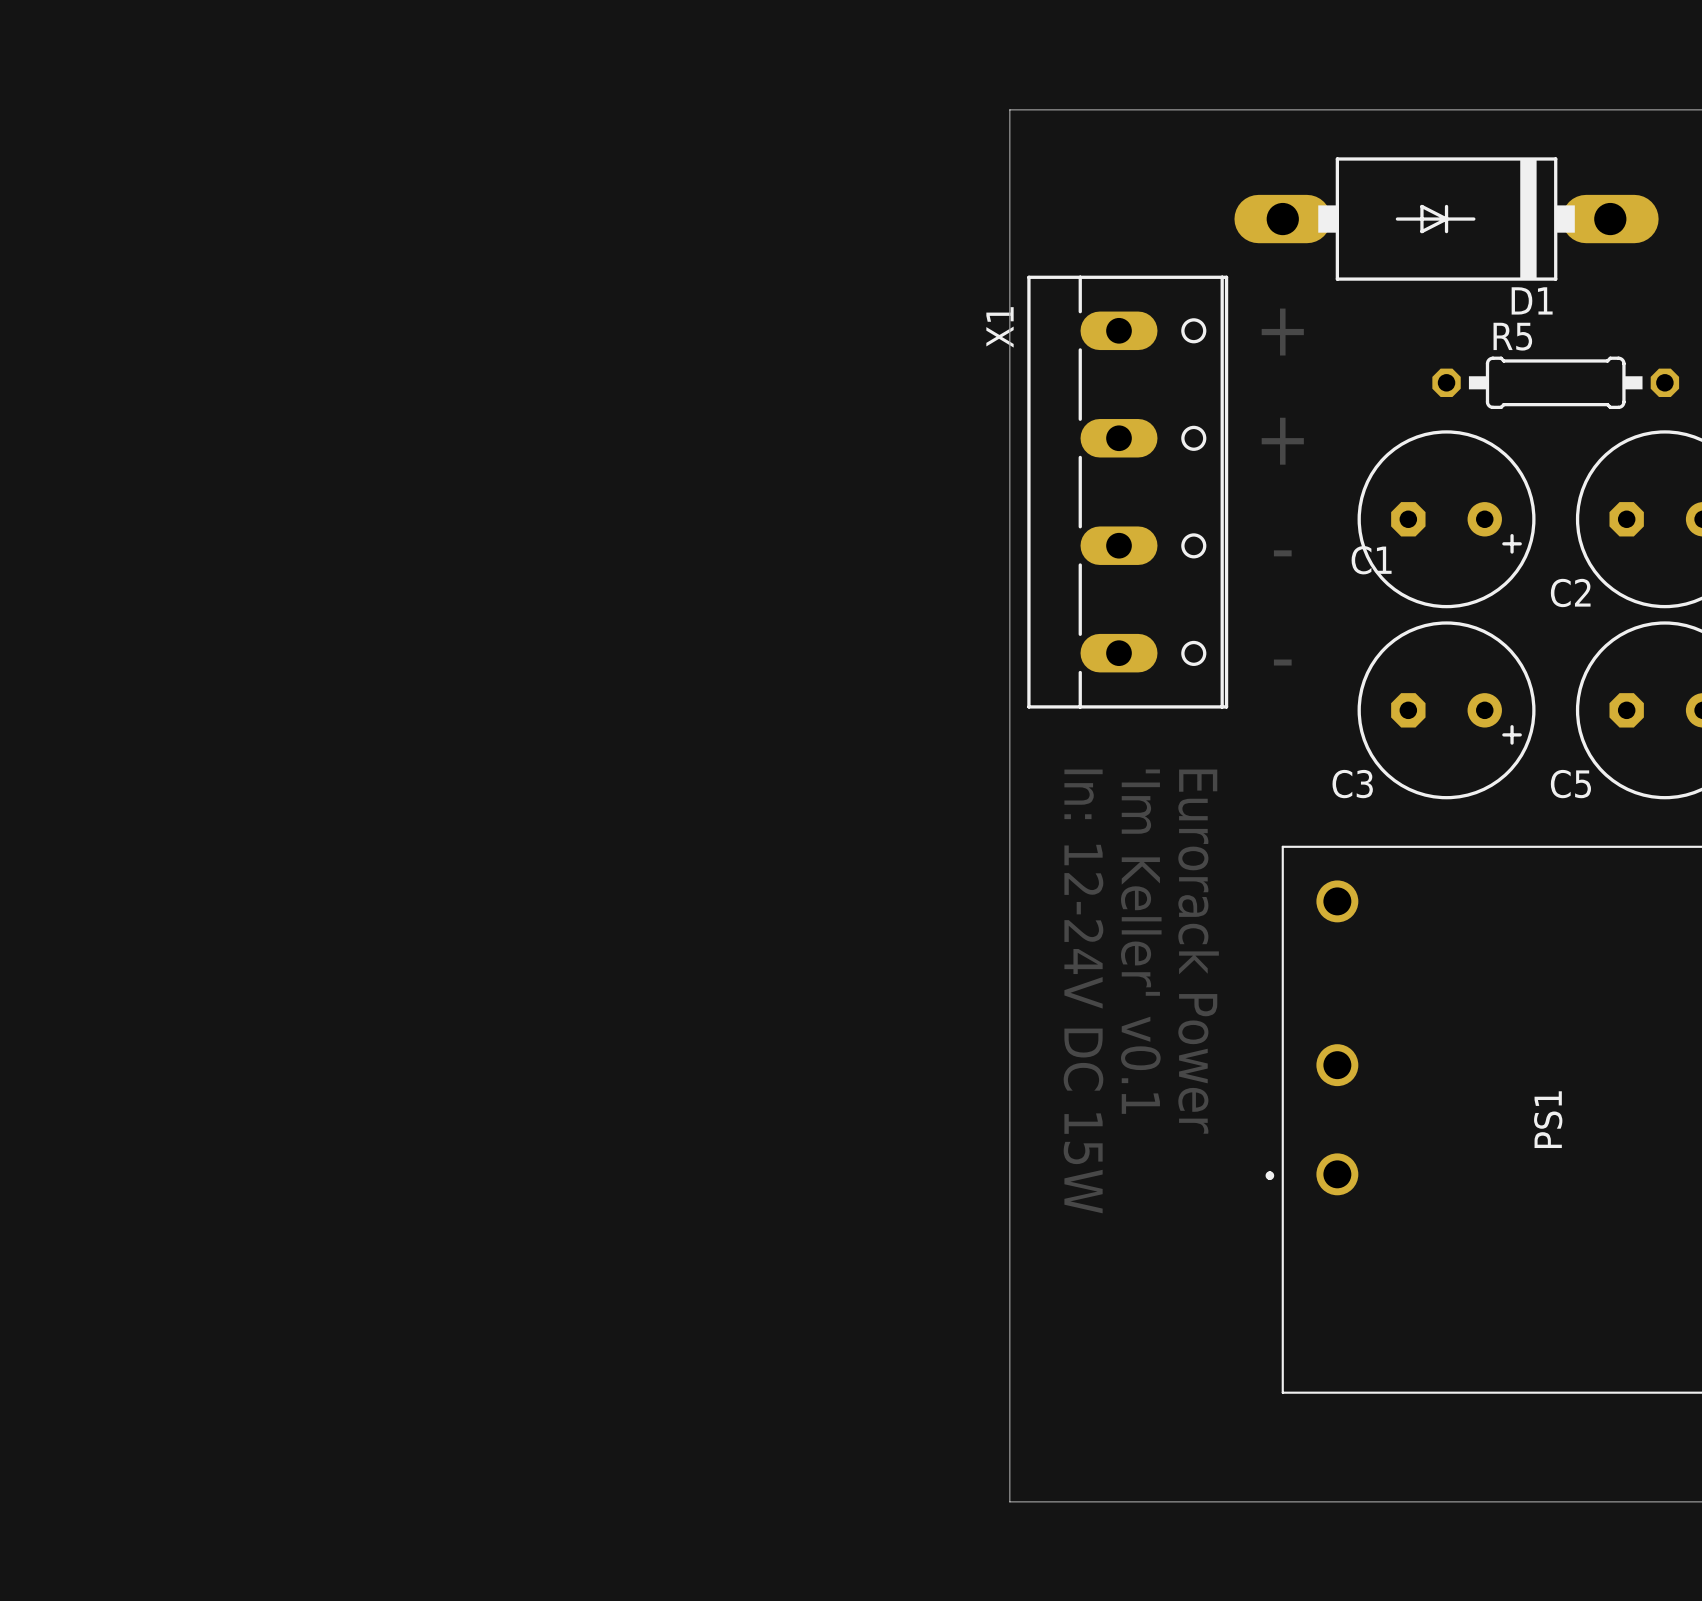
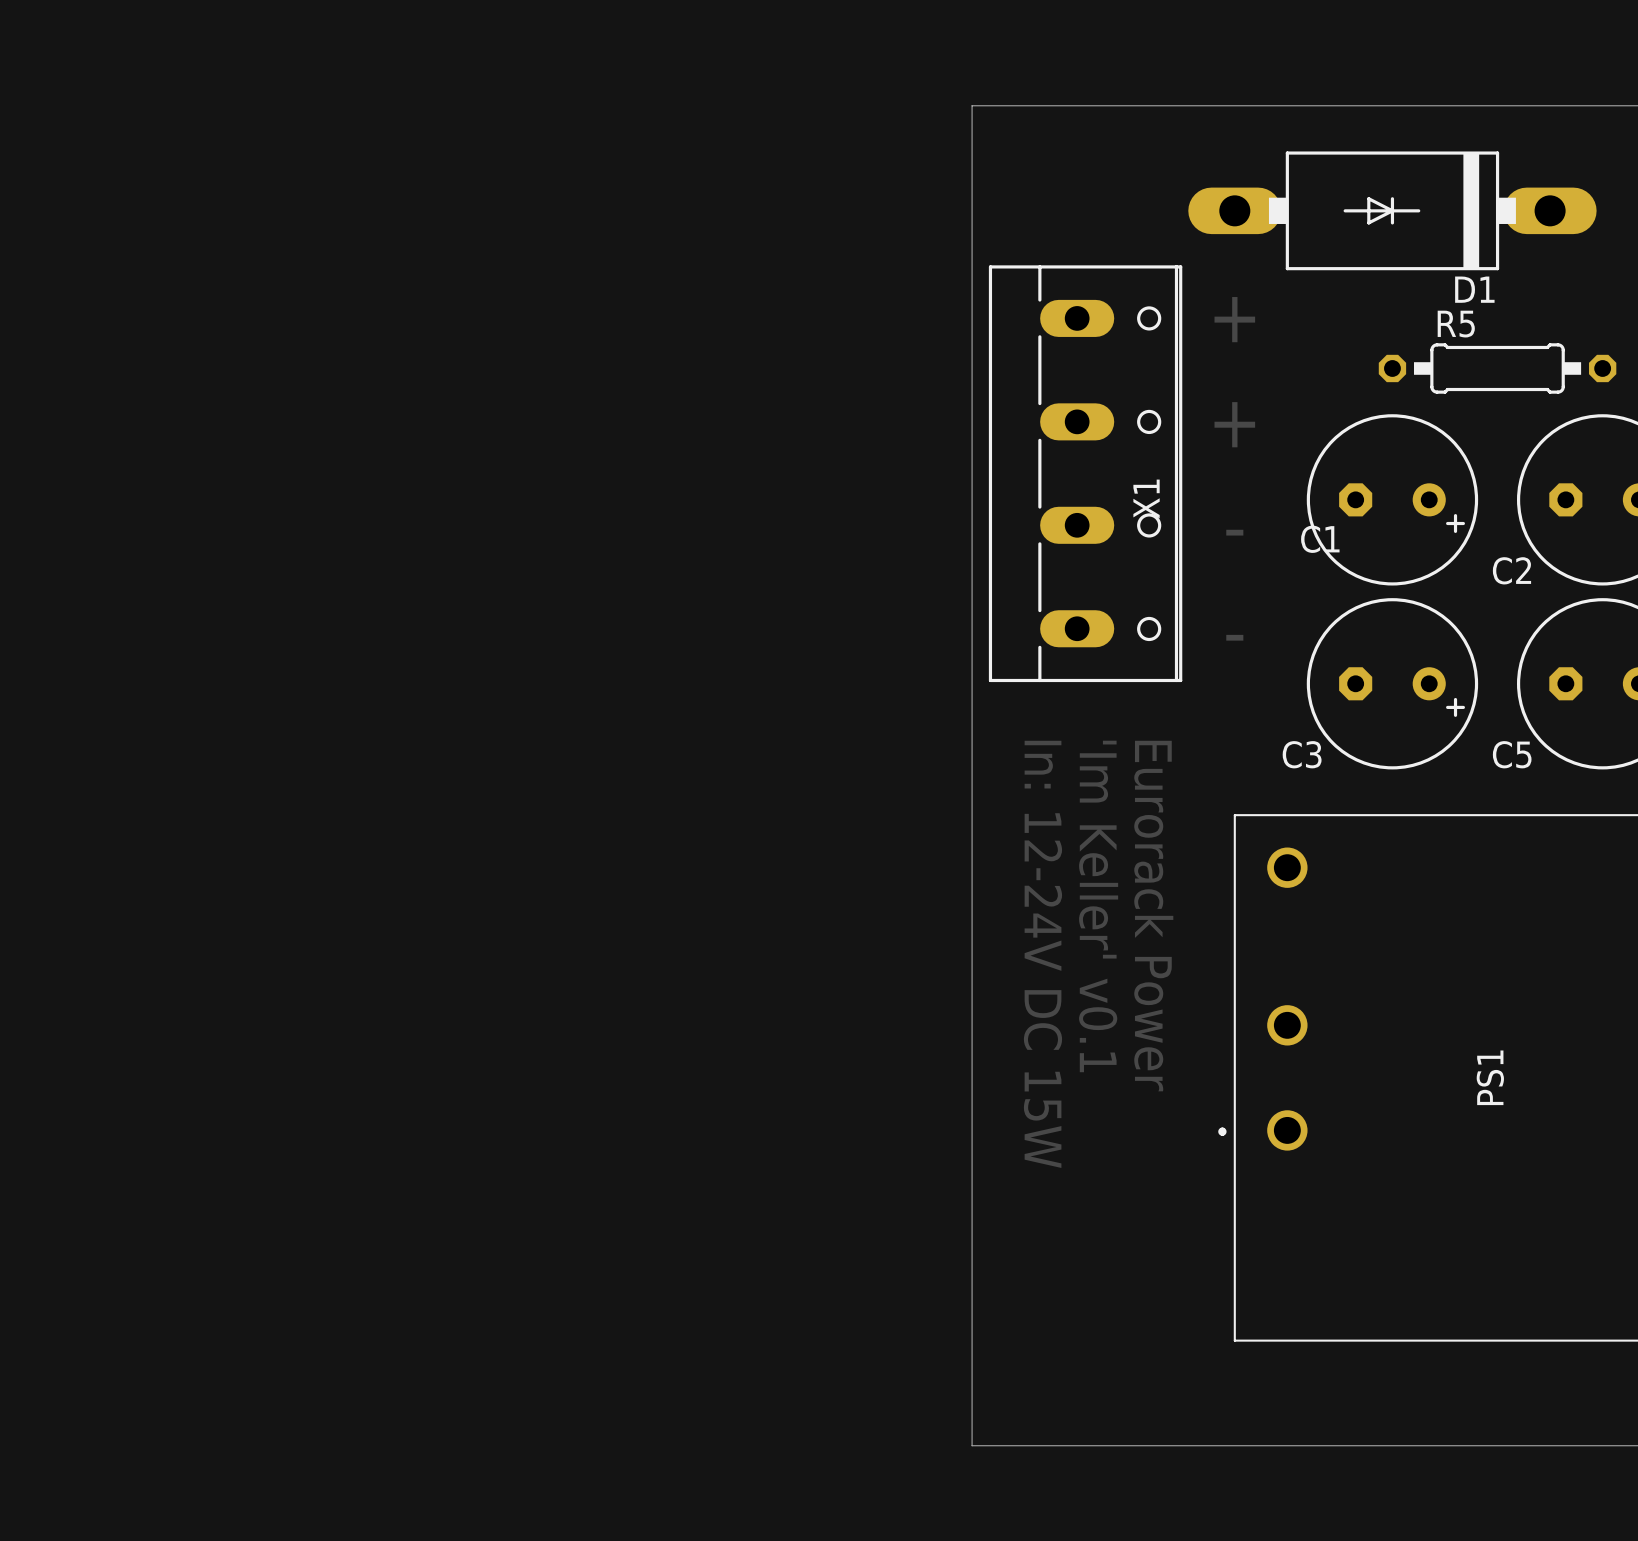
X1 name position: X1 (1000, 327) -> X1 (1146, 499)

